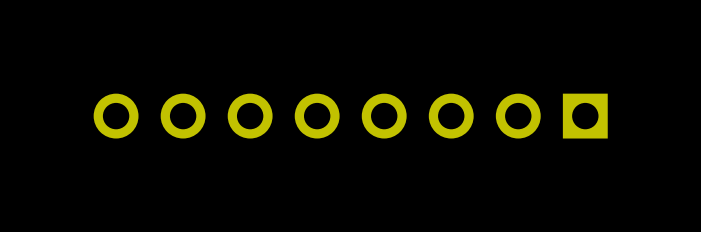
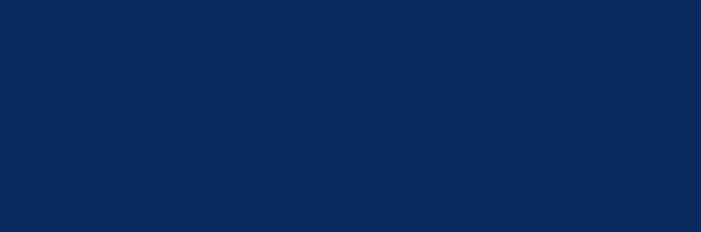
part: (350, 116) -> none

